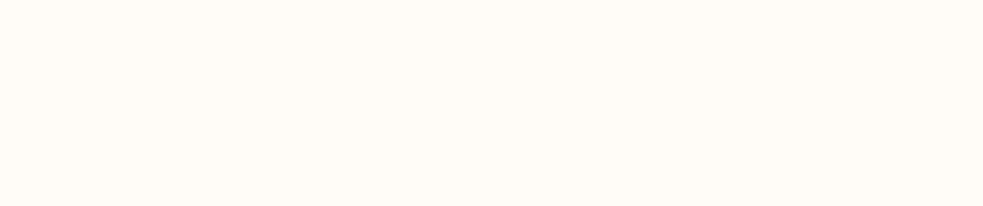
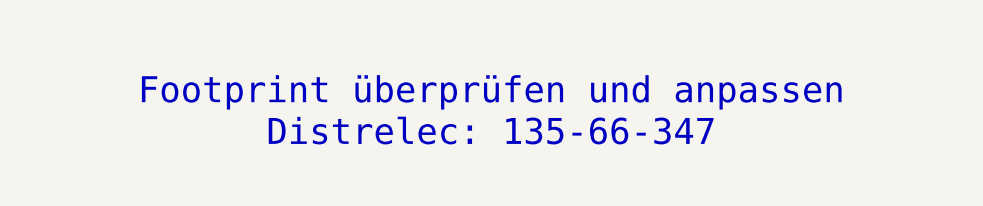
text: none -> Footprint überprüfen und anpassen (491, 92)
text: none -> Distrelec: 135-66-347 (491, 130)

